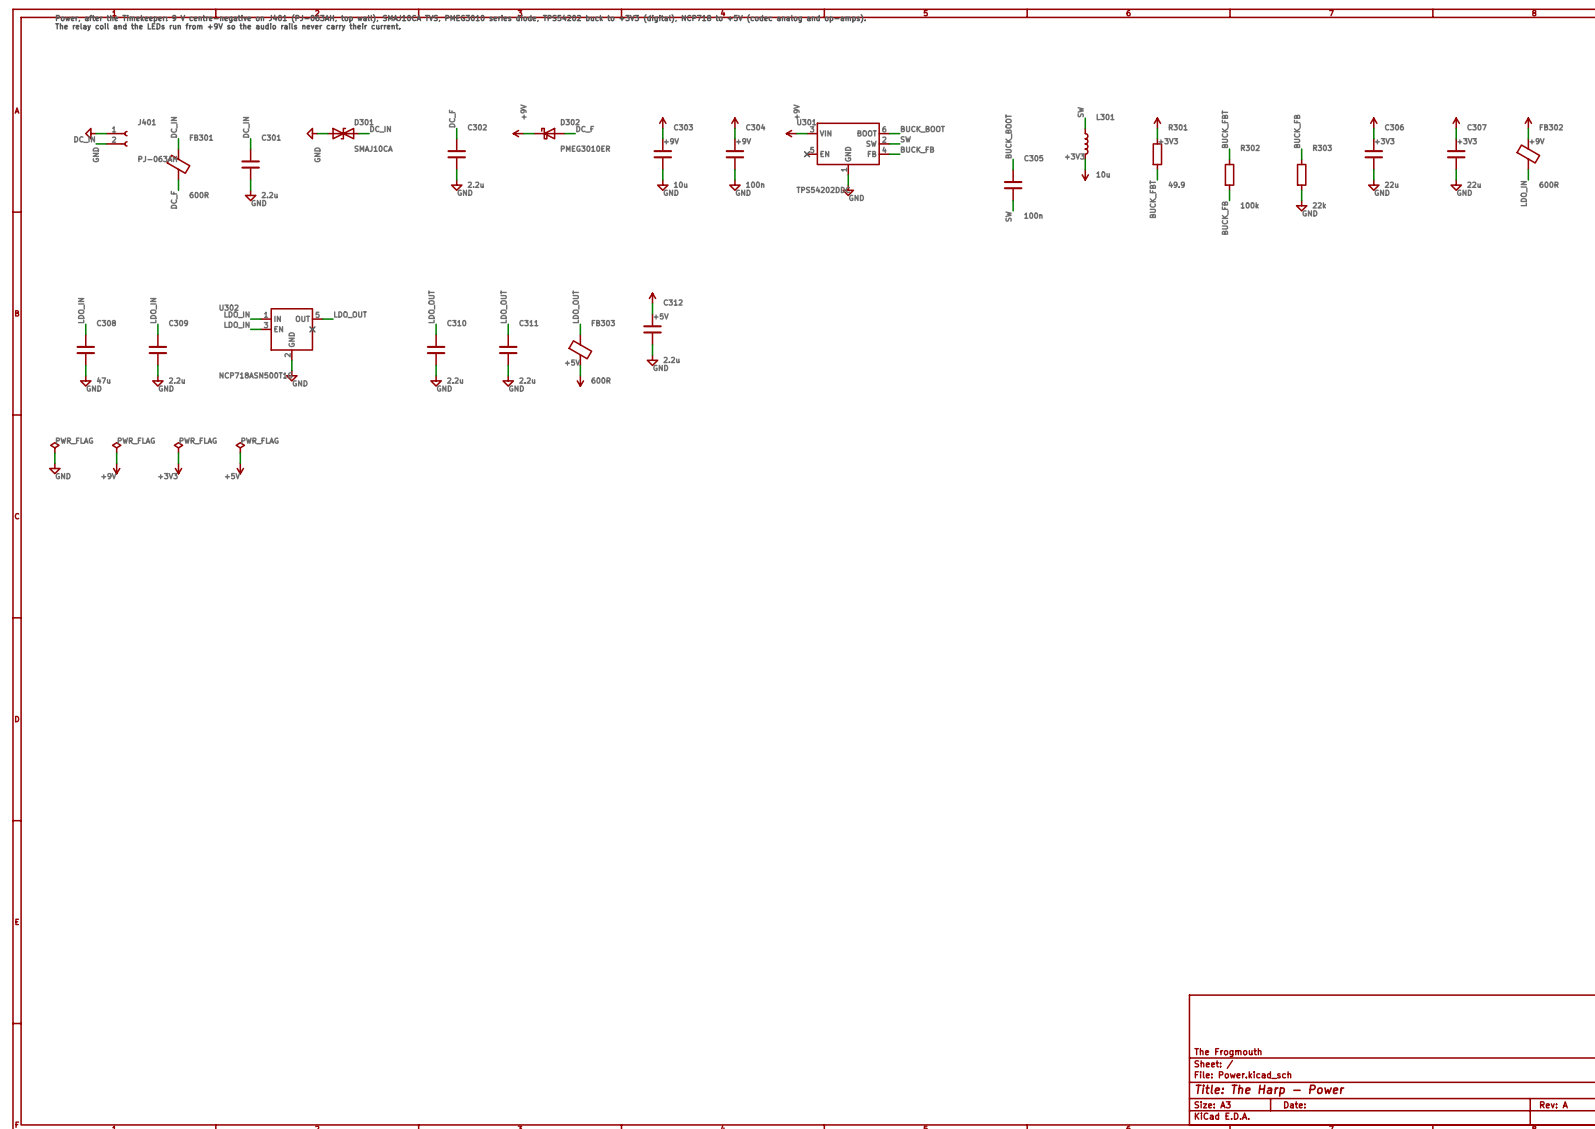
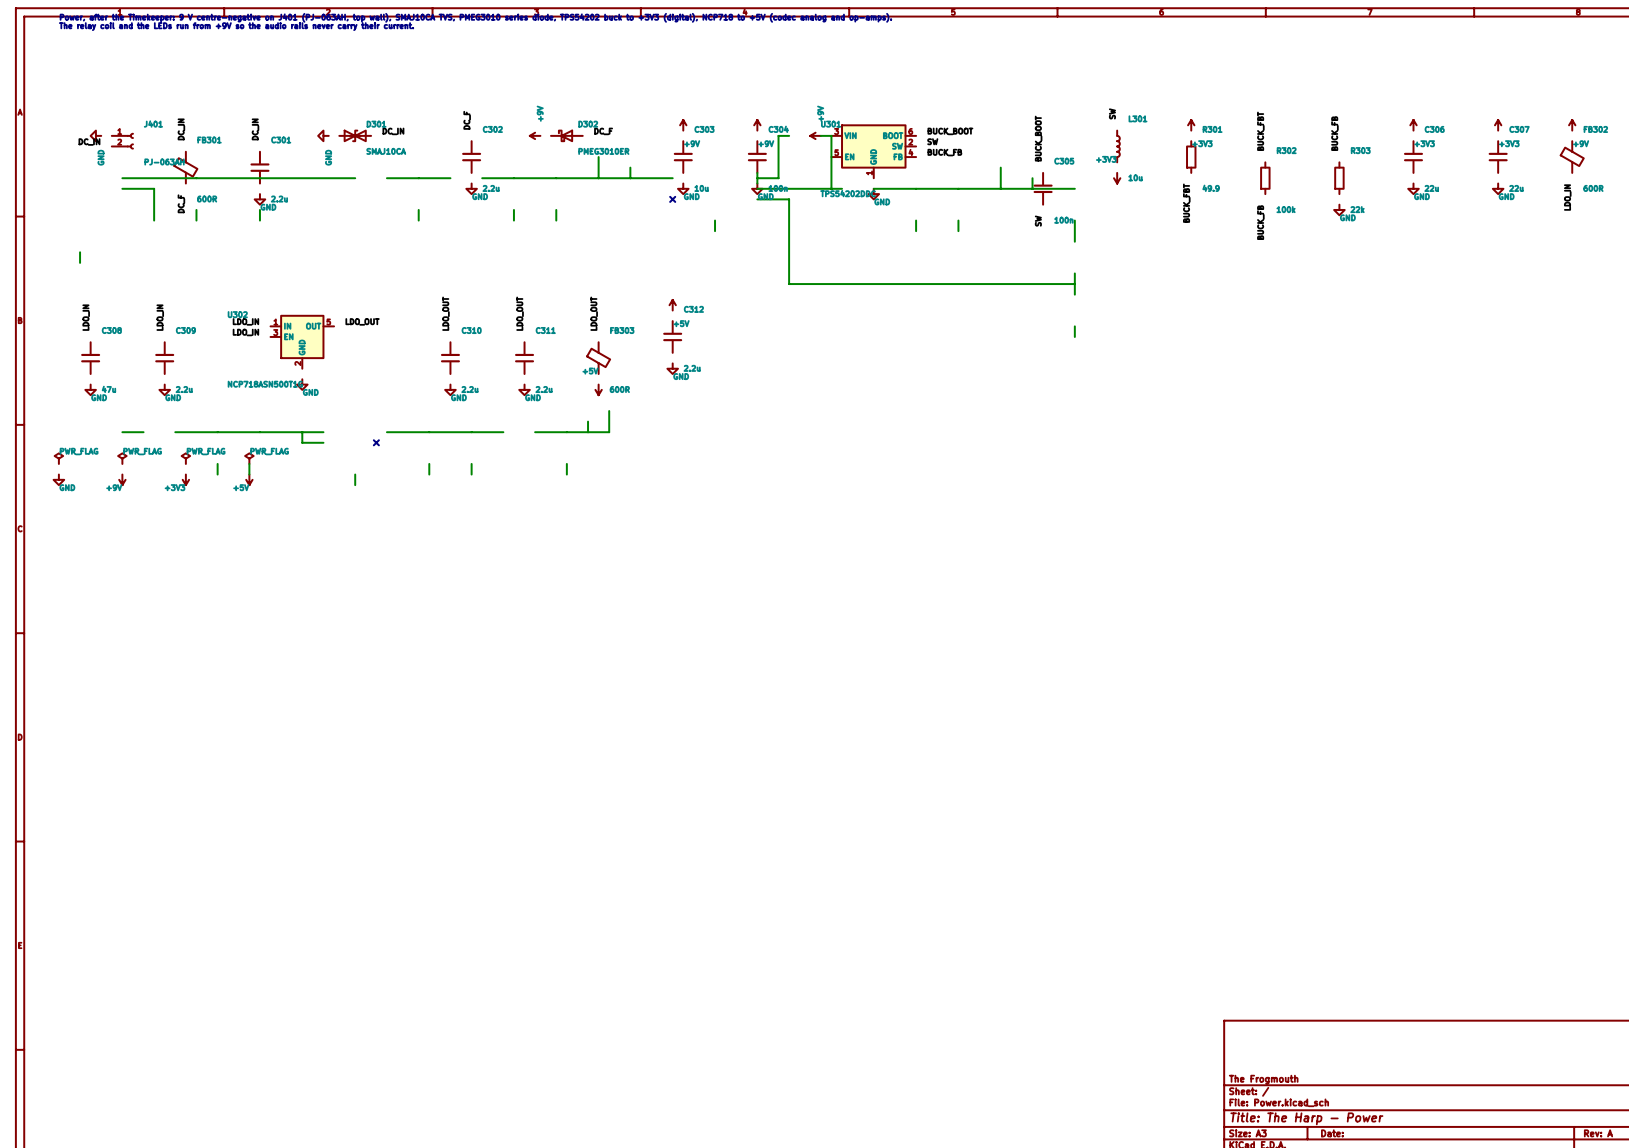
wire: (1085, 118) (1085, 128) -> none
wire: (456, 128) (456, 138) -> (513, 209) (513, 220)
wire: (662, 128) (662, 138) -> (630, 167) (630, 178)
wire: (734, 128) (734, 138) -> none
wire: (1157, 128) (1157, 138) -> none
wire: (1373, 128) (1373, 138) -> none
wire: (1456, 128) (1456, 138) -> none
wire: (1528, 128) (1528, 138) -> none
wire: (96, 133) (106, 133) -> none
wire: (317, 133) (327, 133) -> none
wire: (358, 133) (369, 133) -> none
wire: (523, 133) (533, 133) -> none
wire: (564, 133) (575, 133) -> none
wire: none -> (789, 135) (778, 135) (778, 178) (757, 178)
wire: none -> (831, 135) (831, 188)
wire: (889, 133) (899, 133) -> none
wire: (178, 138) (178, 149) -> none
wire: (250, 138) (250, 149) -> none
wire: (96, 143) (106, 143) -> none
wire: (889, 143) (899, 143) -> none
wire: (1229, 149) (1229, 159) -> none
wire: (1301, 149) (1301, 159) -> none
wire: none -> (598, 157) (598, 178)
no-connect mark: (807, 154) -> none
wire: (889, 154) (899, 154) -> none
wire: (1013, 159) (1013, 169) -> none
wire: (1085, 159) (1085, 169) -> (1032, 178) (1032, 188)
wire: none -> (1000, 167) (1000, 188)
wire: (456, 169) (456, 179) -> (418, 209) (418, 220)
wire: (662, 169) (662, 179) -> (715, 220) (715, 231)
wire: (1157, 169) (1157, 179) -> none
wire: (1373, 169) (1373, 179) -> none
wire: (1456, 169) (1456, 179) -> none
wire: (1528, 169) (1528, 179) -> none
wire: none -> (122, 178) (355, 178)
wire: none -> (386, 178) (450, 178)
wire: none -> (482, 178) (672, 178)
wire: (848, 174) (848, 185) -> (1074, 188) (873, 188)
wire: (178, 179) (178, 190) -> (196, 209) (196, 220)
wire: (250, 179) (250, 190) -> (259, 209) (259, 220)
wire: none -> (122, 188) (154, 188) (154, 220)
wire: none -> (757, 188) (842, 188)
wire: (1229, 190) (1229, 200) -> none
wire: (1301, 190) (1301, 200) -> none
no-connect mark: none -> (672, 199)
wire: none -> (757, 199) (789, 199) (789, 284) (1074, 284)
wire: (1013, 200) (1013, 210) -> (958, 220) (958, 231)
wire: none -> (556, 209) (556, 220)
wire: none -> (916, 220) (916, 231)
wire: none -> (1074, 220) (1074, 241)
wire: none -> (1074, 273) (1074, 294)
wire: (652, 303) (652, 313) -> none
wire: (250, 319) (260, 319) -> none
wire: (322, 319) (333, 319) -> none
wire: none -> (1074, 326) (1074, 336)
wire: (85, 324) (85, 334) -> (80, 252) (80, 262)
wire: (157, 324) (157, 334) -> none
wire: (436, 324) (436, 334) -> none
wire: (508, 324) (508, 334) -> none
wire: (580, 324) (580, 334) -> none
wire: (250, 329) (260, 329) -> none
no-connect mark: (312, 329) -> none
wire: (652, 344) (652, 355) -> none
wire: (291, 360) (291, 370) -> none
wire: (85, 365) (85, 375) -> none
wire: (157, 365) (157, 375) -> none
wire: (436, 365) (436, 375) -> (429, 463) (429, 474)
wire: (508, 365) (508, 375) -> (566, 463) (566, 474)
wire: (580, 365) (580, 375) -> (588, 421) (588, 432)
wire: none -> (609, 411) (609, 432) (535, 432)
wire: none -> (122, 432) (143, 432)
wire: none -> (175, 432) (323, 432)
wire: none -> (302, 432) (302, 442) (323, 442)
wire: none -> (386, 432) (503, 432)
no-connect mark: none -> (376, 442)
wire: (54, 453) (54, 463) -> none
wire: (116, 453) (116, 463) -> none
wire: (178, 453) (178, 463) -> (217, 463) (217, 474)
wire: none -> (471, 463) (471, 474)
wire: none -> (355, 474) (355, 485)

